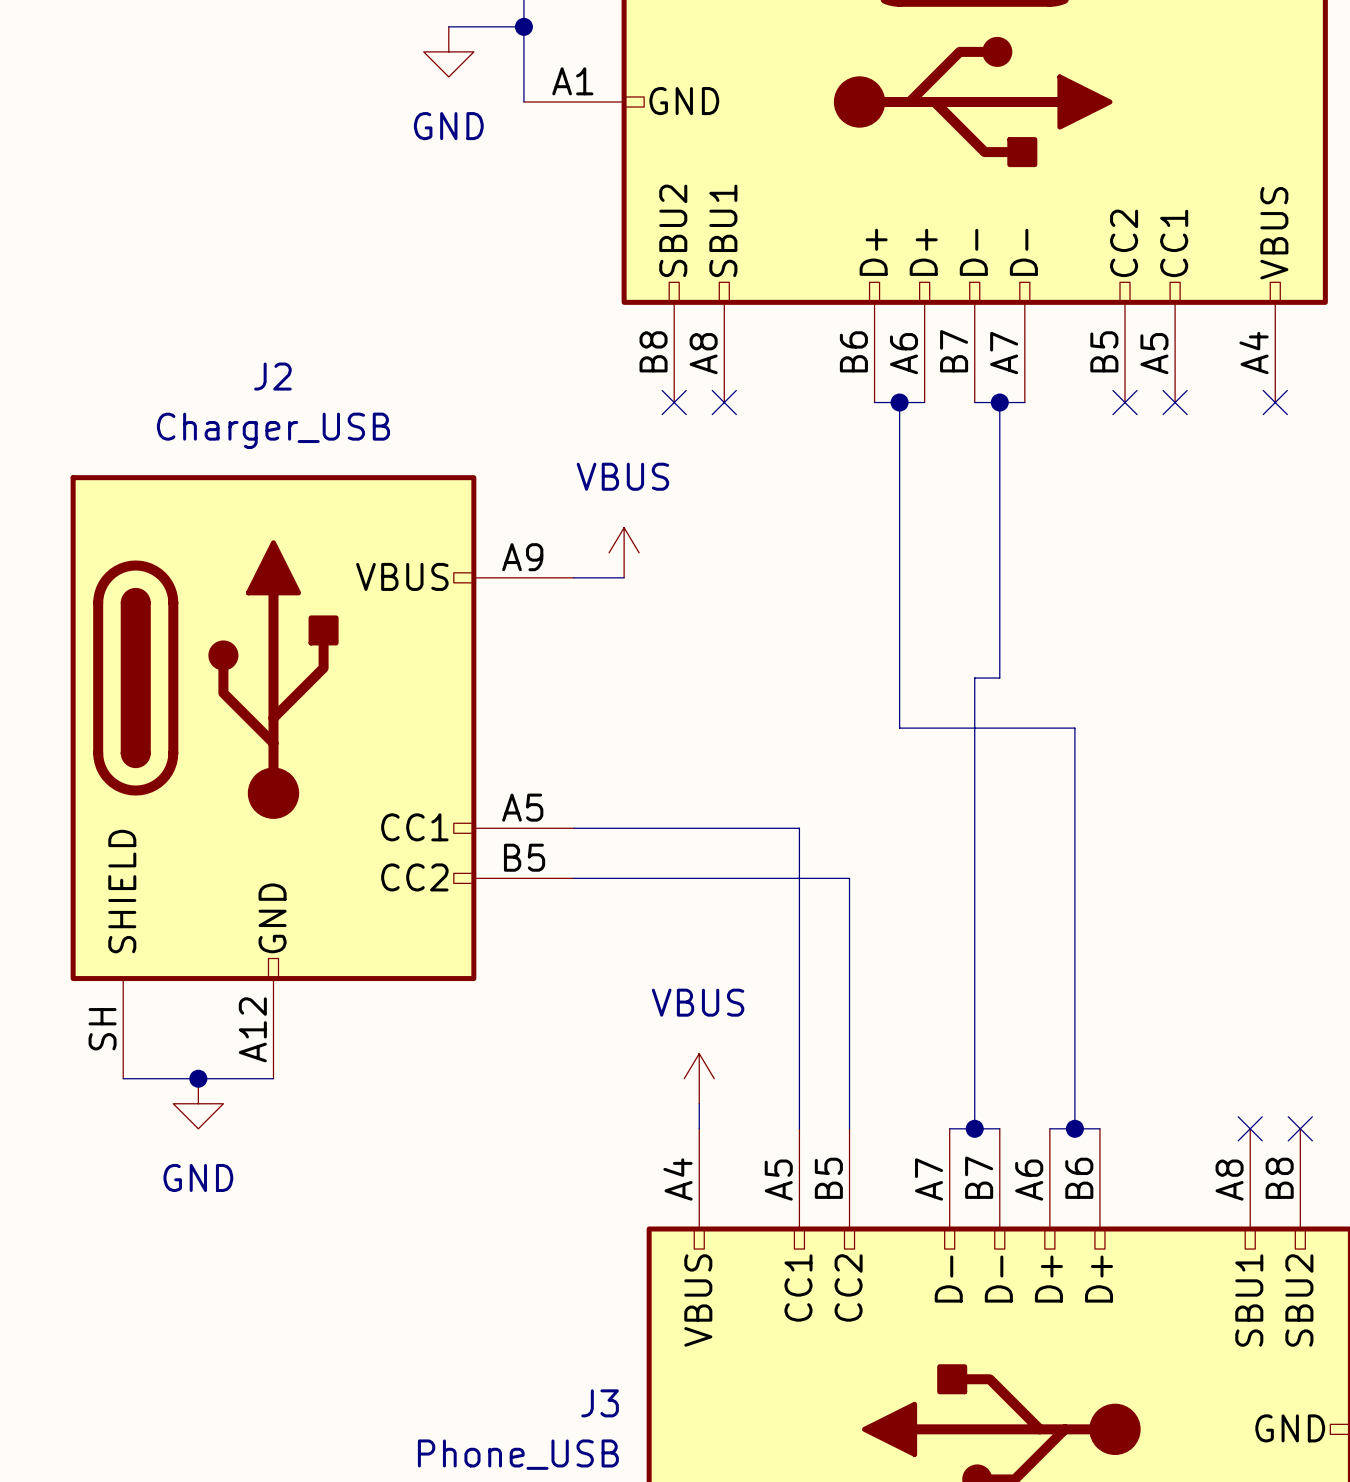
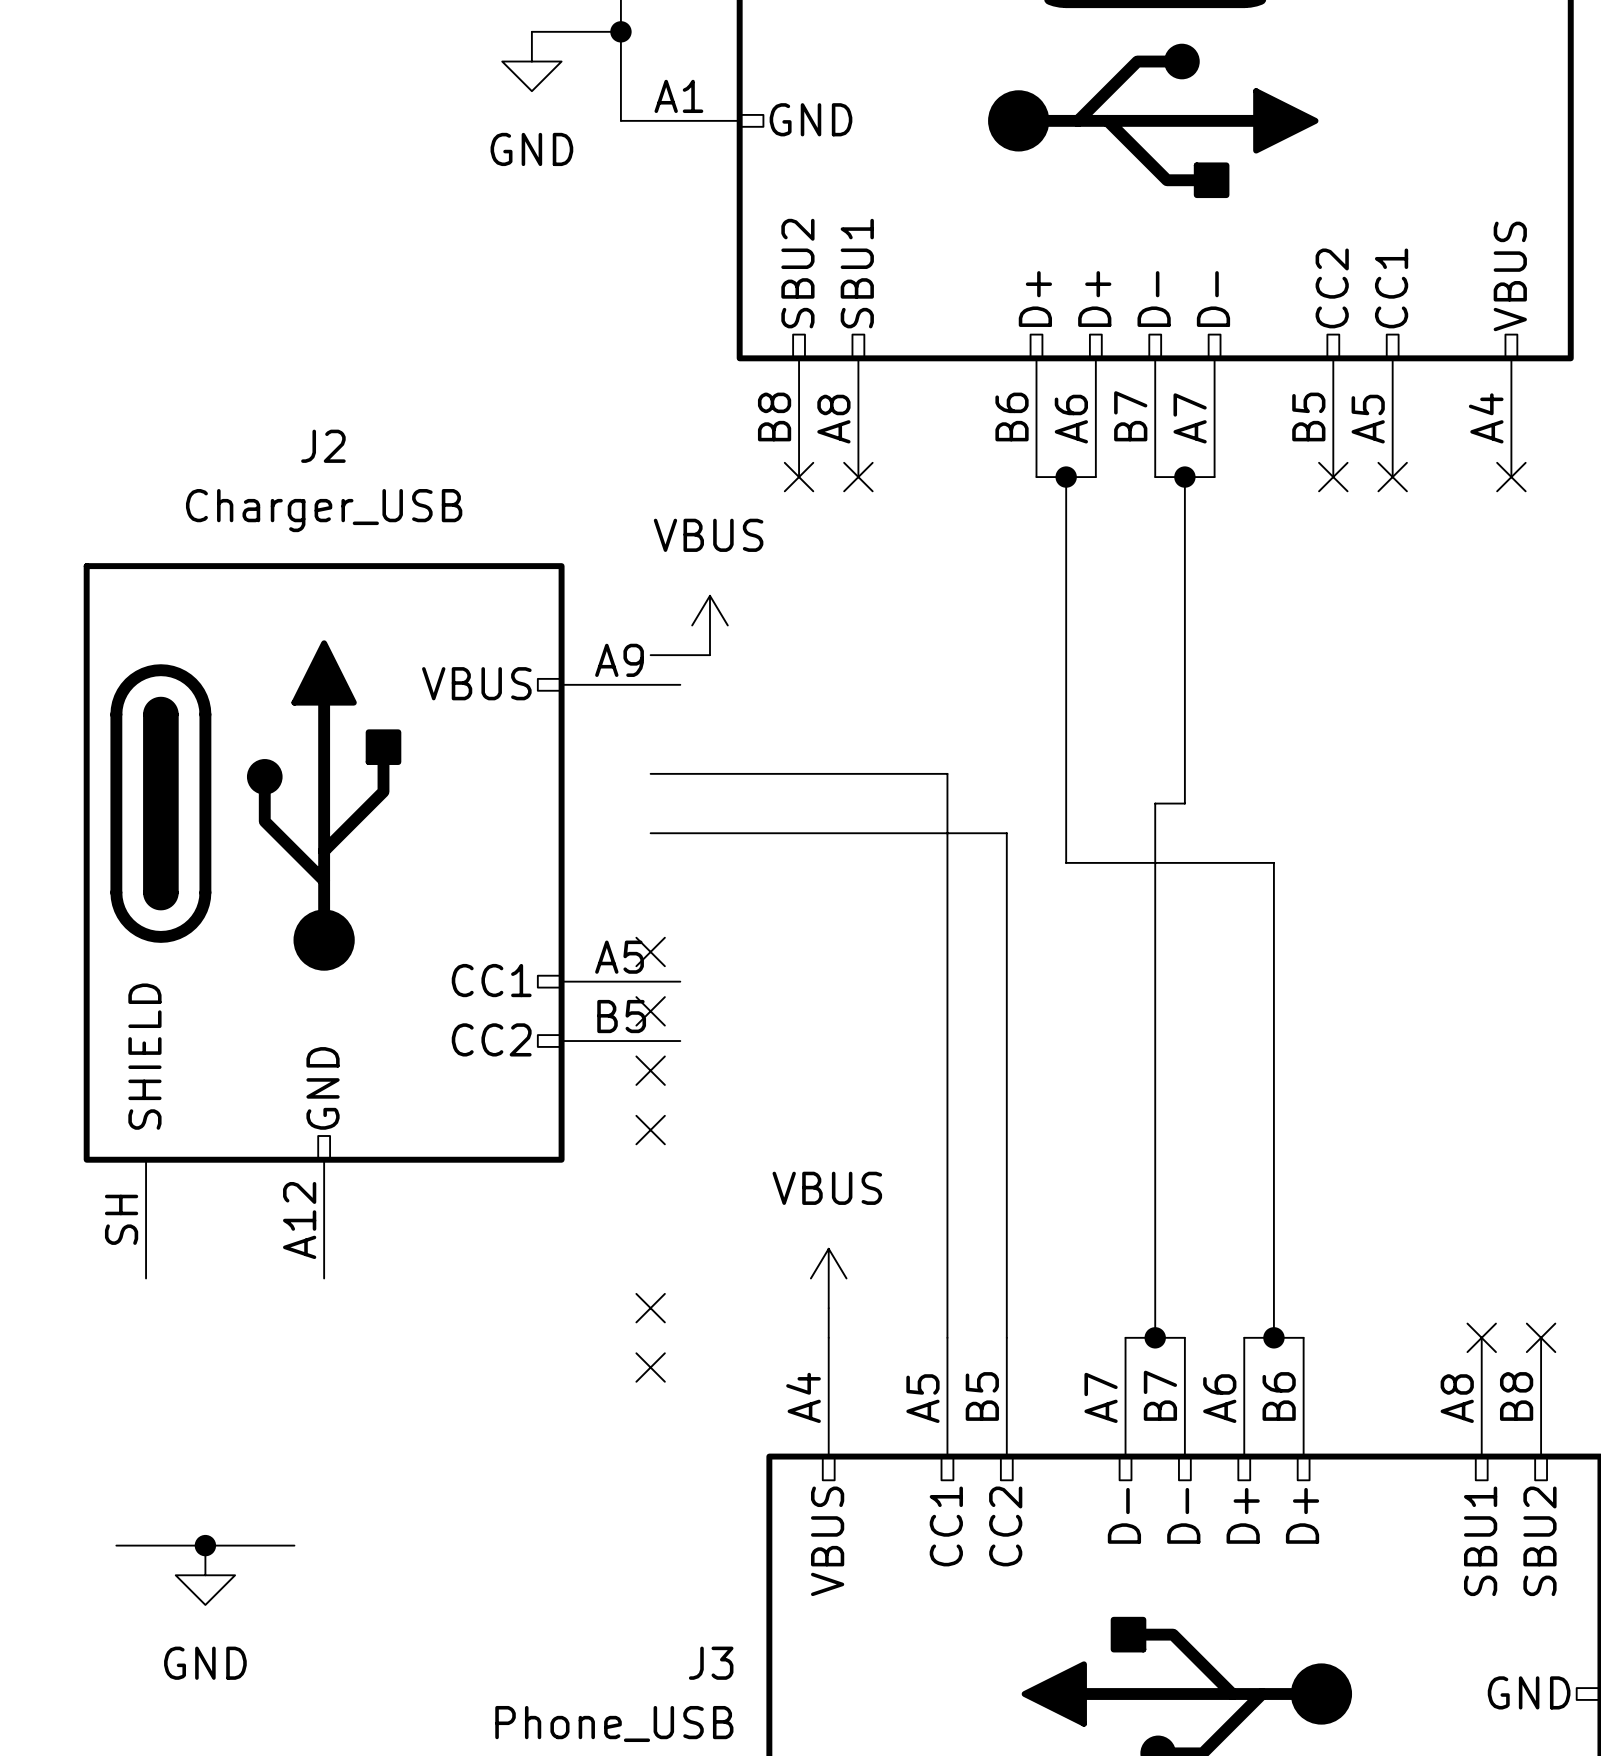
power symbol position: VBUS (624, 552) -> VBUS (709, 625)
wire: (574, 577) (624, 577) -> (650, 655) (709, 655)
no-connect mark: none -> (650, 951)
wire: (574, 828) (799, 828) -> (650, 773) (947, 773) (947, 981)
no-connect mark: none -> (650, 1011)
wire: (574, 878) (849, 878) -> (650, 833) (1006, 833) (1006, 1041)
no-connect mark: none -> (650, 1070)
no-connect mark: none -> (650, 1130)
wire: (123, 1078) (273, 1078) -> (116, 1545) (294, 1545)
junction: (198, 1078) -> none
power symbol position: GND (198, 1103) -> GND (205, 1575)
no-connect mark: none -> (650, 1308)
no-connect mark: none -> (650, 1367)
junction: none -> (205, 1545)

